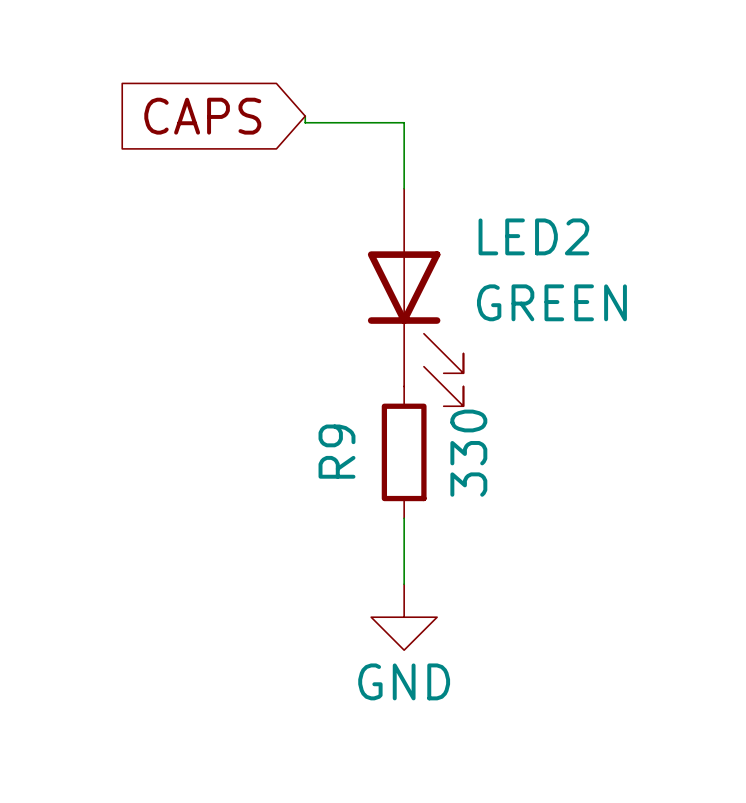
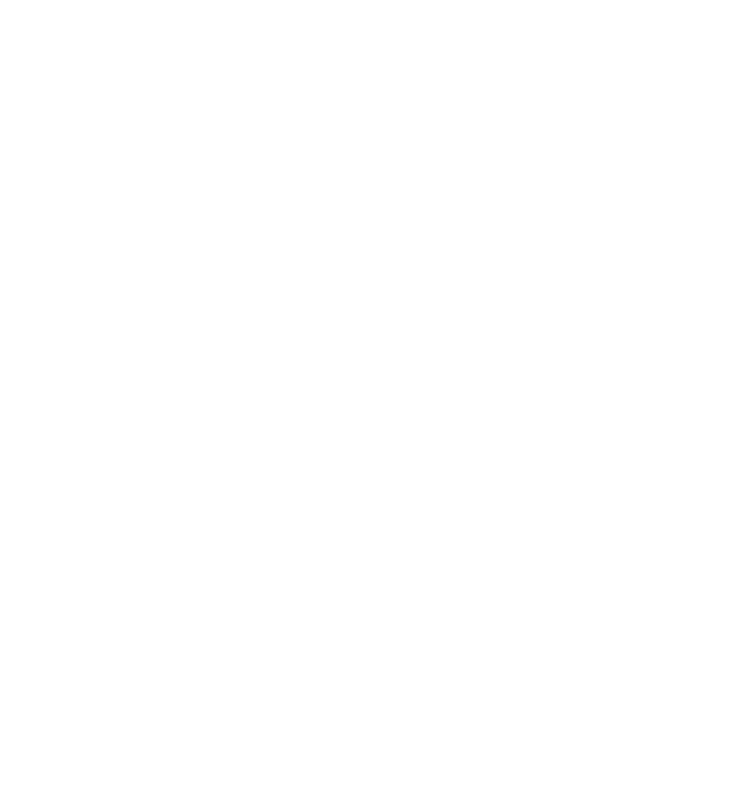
global label: CAPS (202, 116) -> none
wire: (305, 116) (305, 122) (404, 122) (404, 188) -> none
LED2: GREEN (415, 297) -> none
R9: 330 (404, 452) -> none
wire: (404, 518) (404, 584) -> none
power symbol: GND (404, 617) -> none

